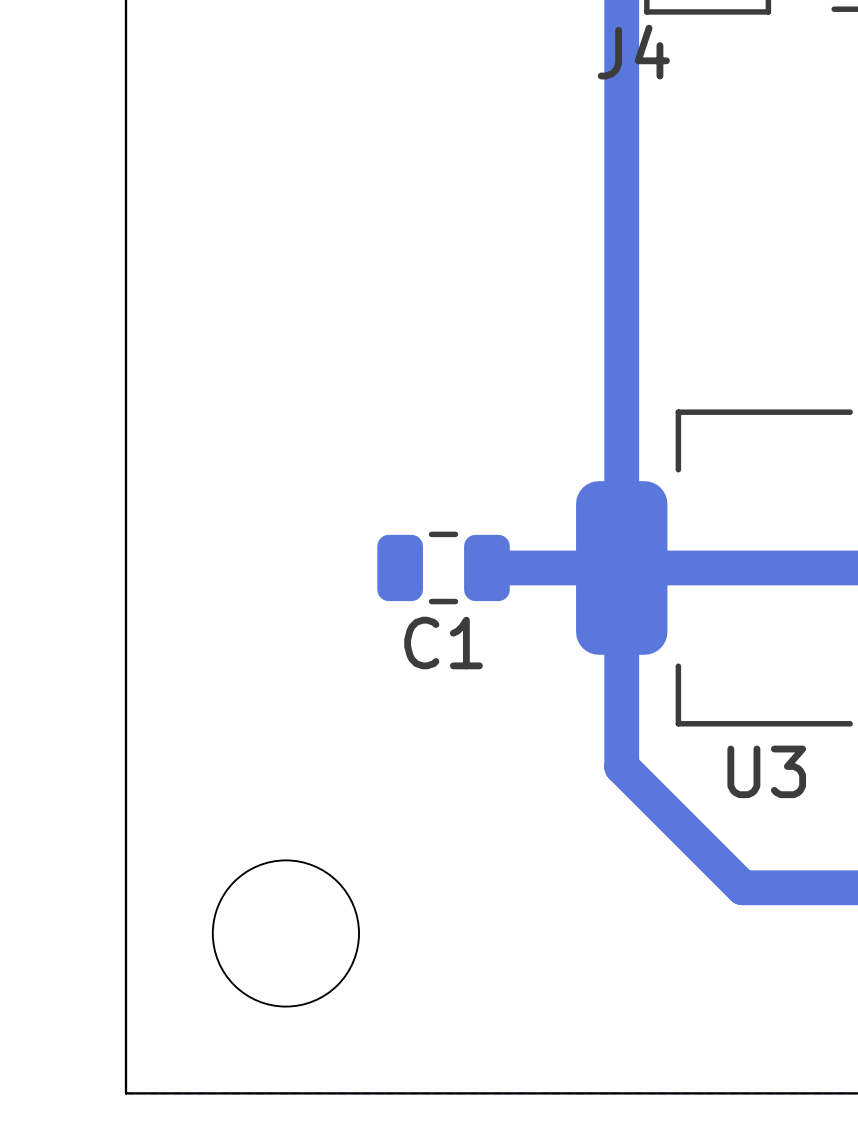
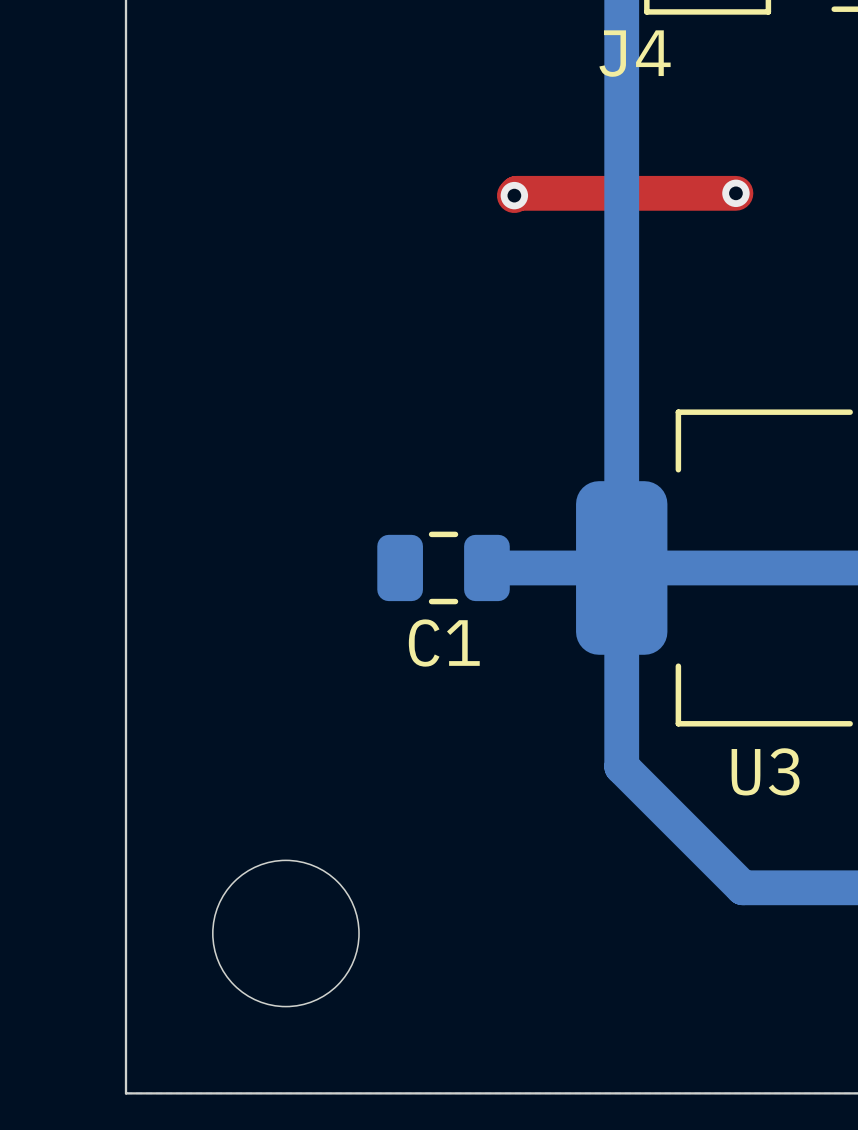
top track: none -> (735, 193) (516, 193) (514, 195)
via: none -> (735, 193)
via: none -> (514, 195)

